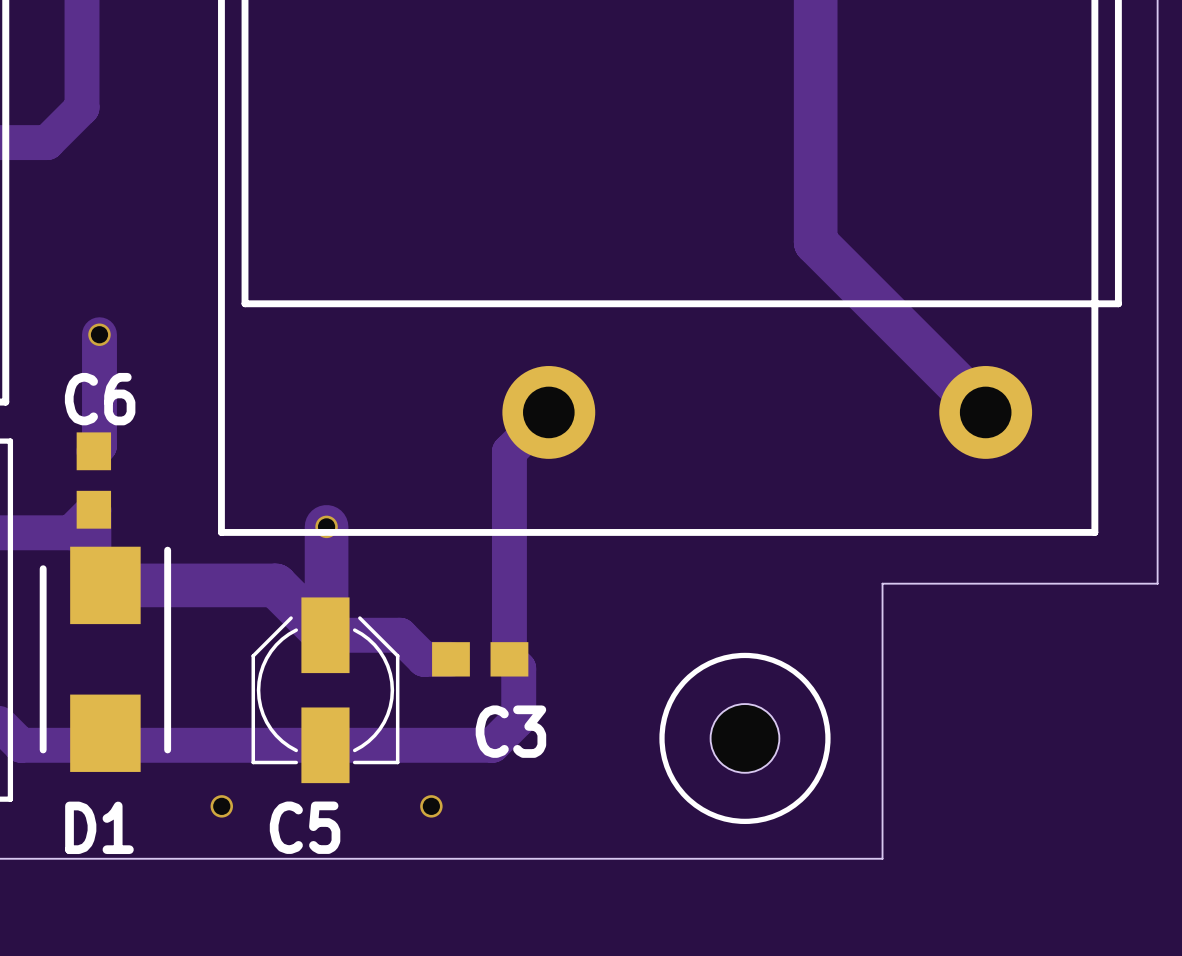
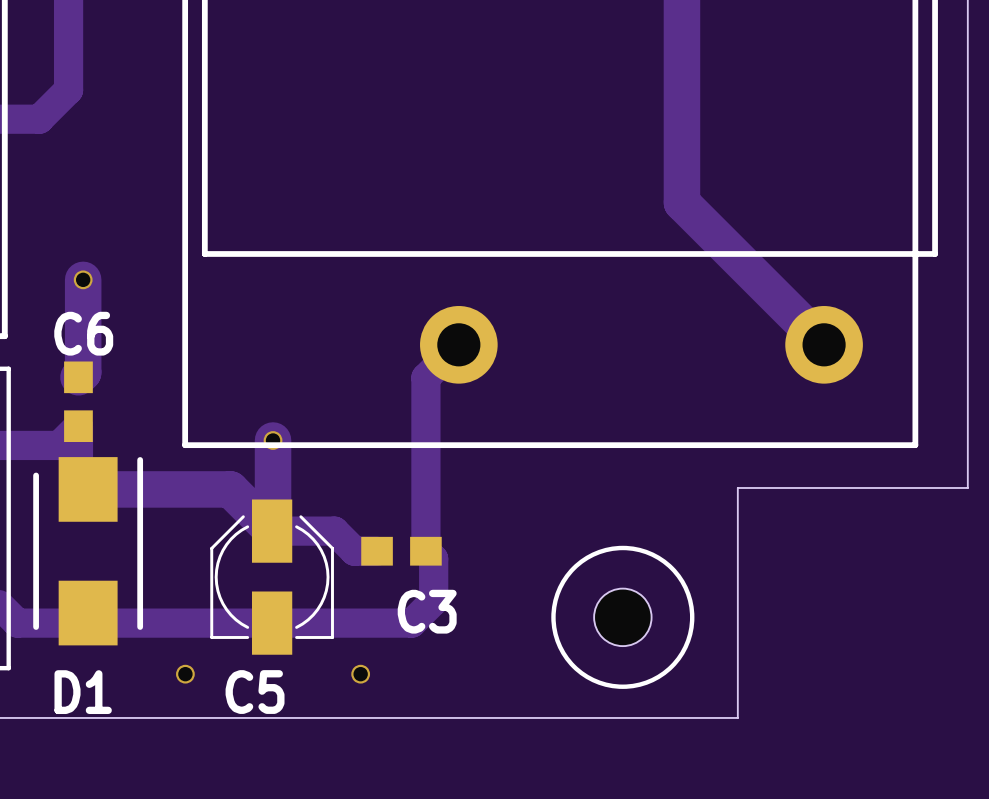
track width: thin (99, 334) (99, 445) (93, 451) -> thick (83, 279) (83, 372) (78, 377)

